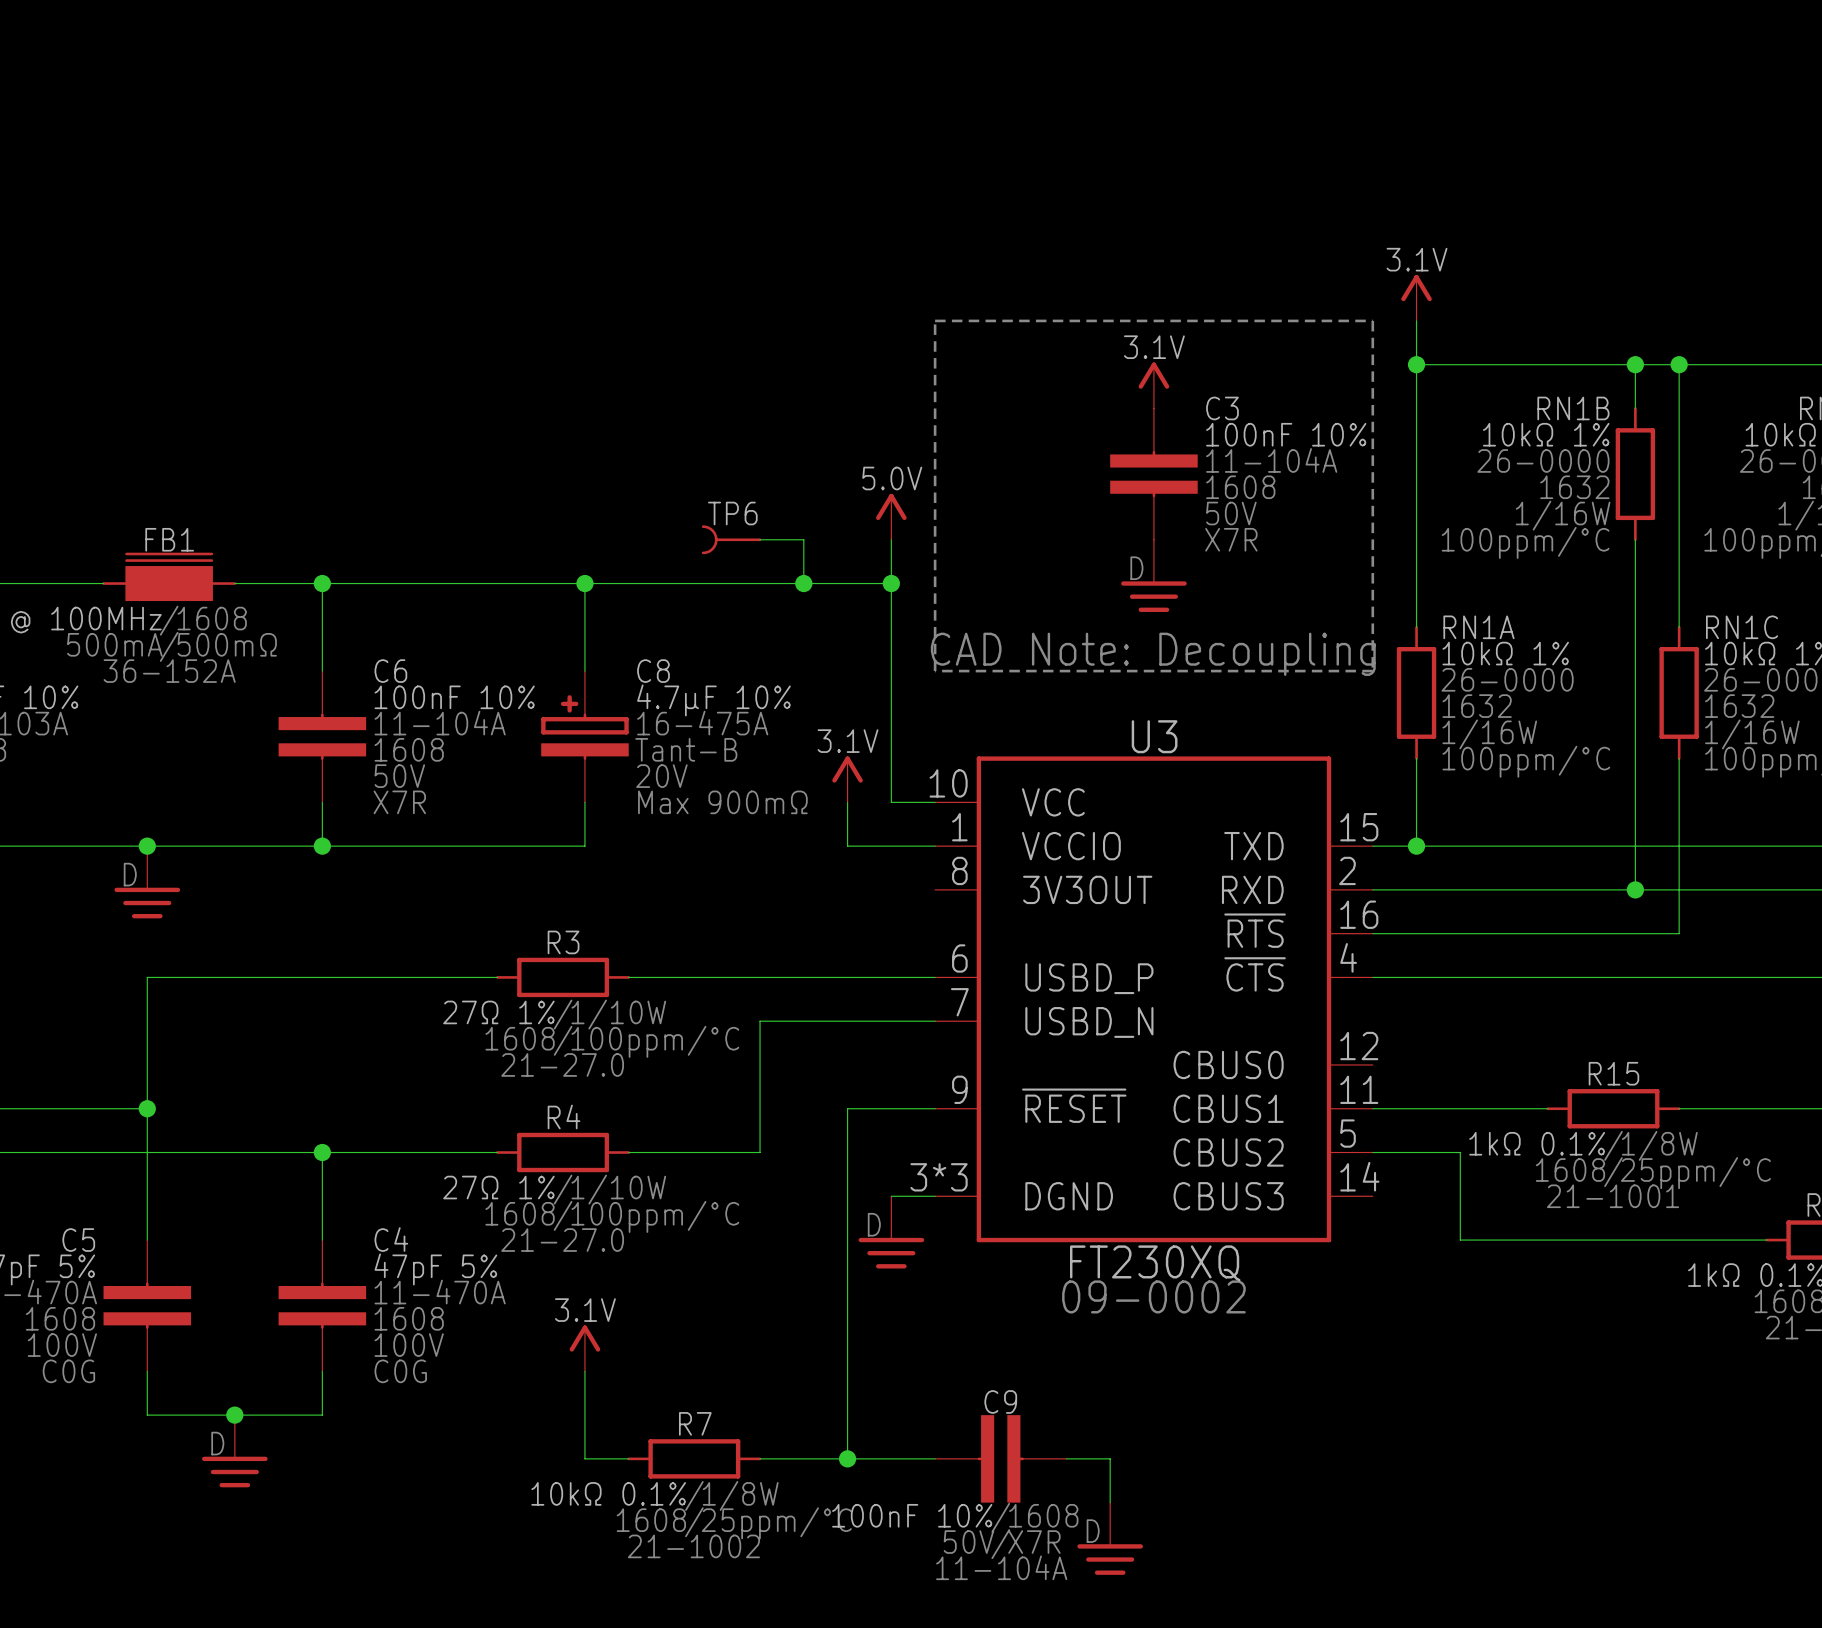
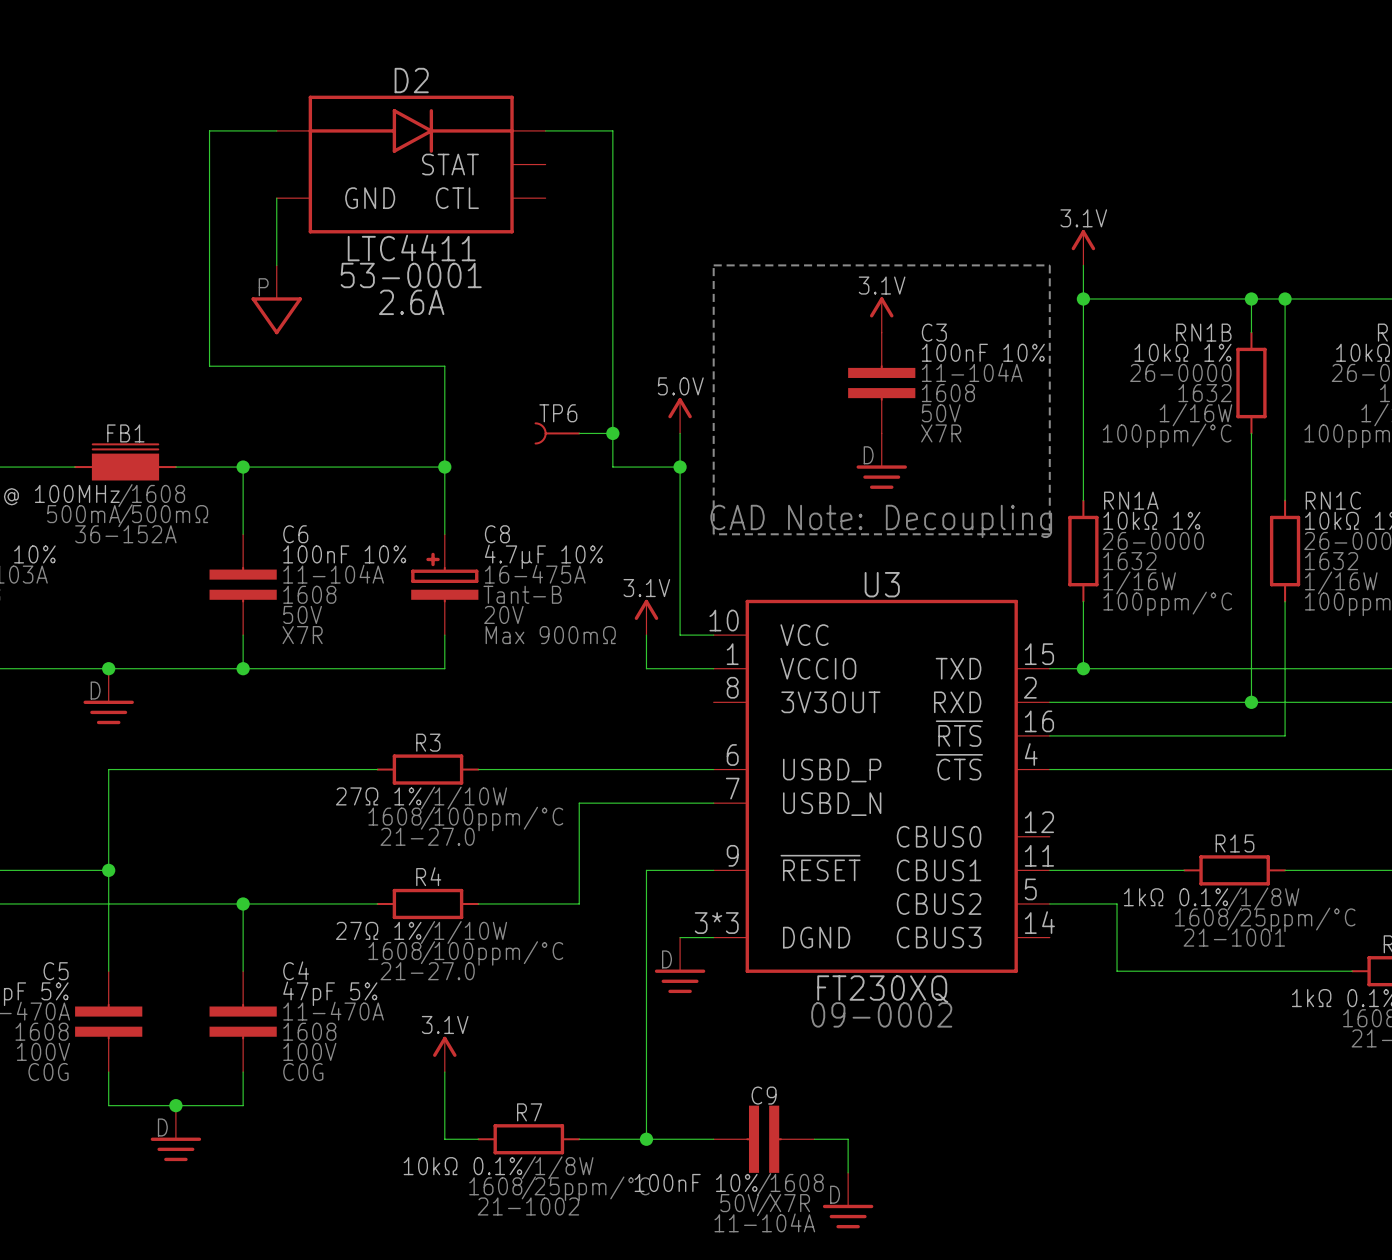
wire: none -> (545, 130) (612, 130) (612, 433)
D2: none -> LTC4411 (411, 164)
wire: none -> (276, 198) (276, 265)
power symbol: none -> (276, 299)
wire: (584, 583) (803, 583) -> (444, 467) (444, 366) (209, 366) (209, 130) (276, 130)
junction position: (803, 583) -> (612, 433)

